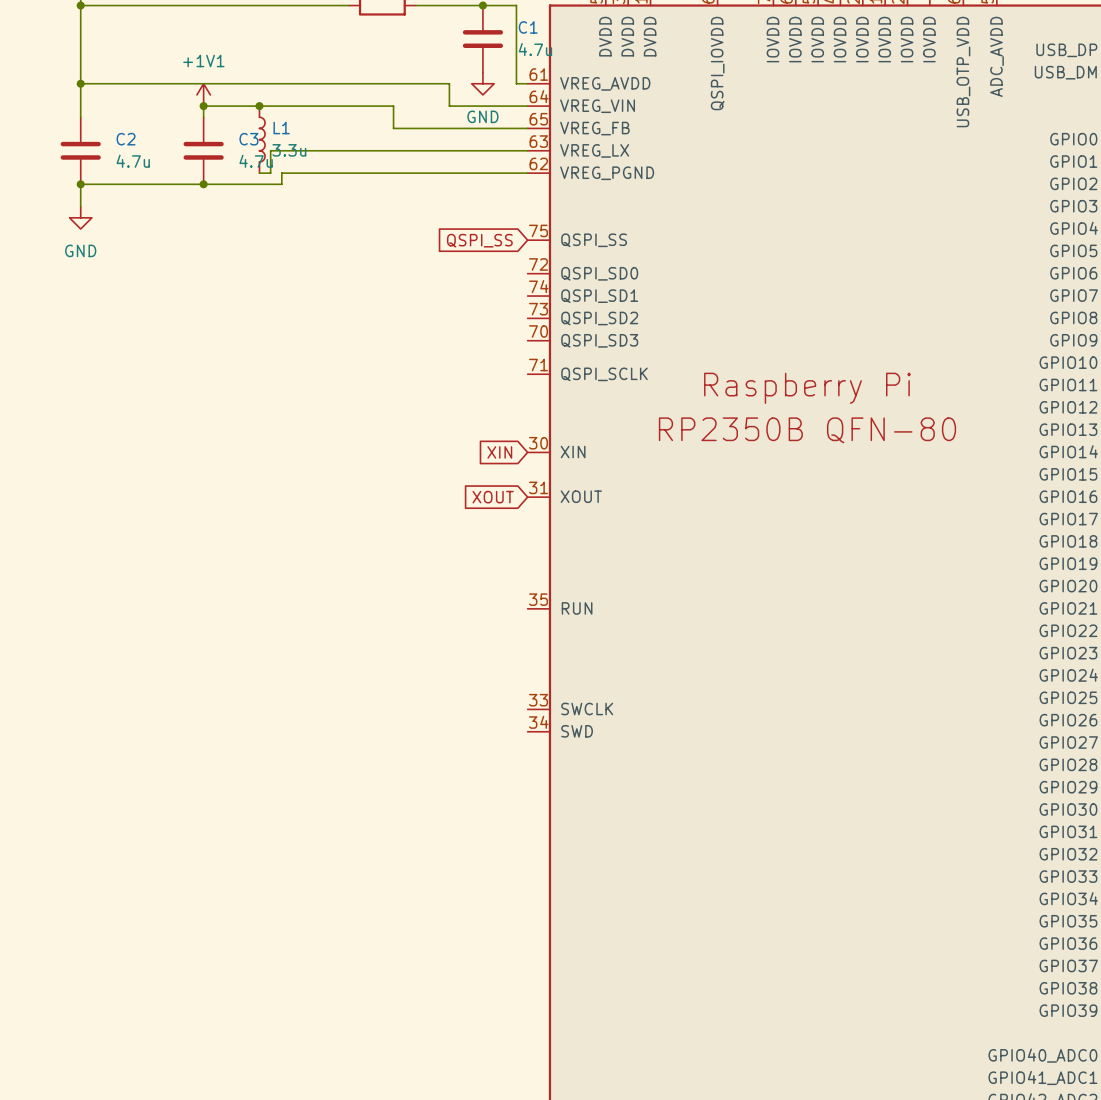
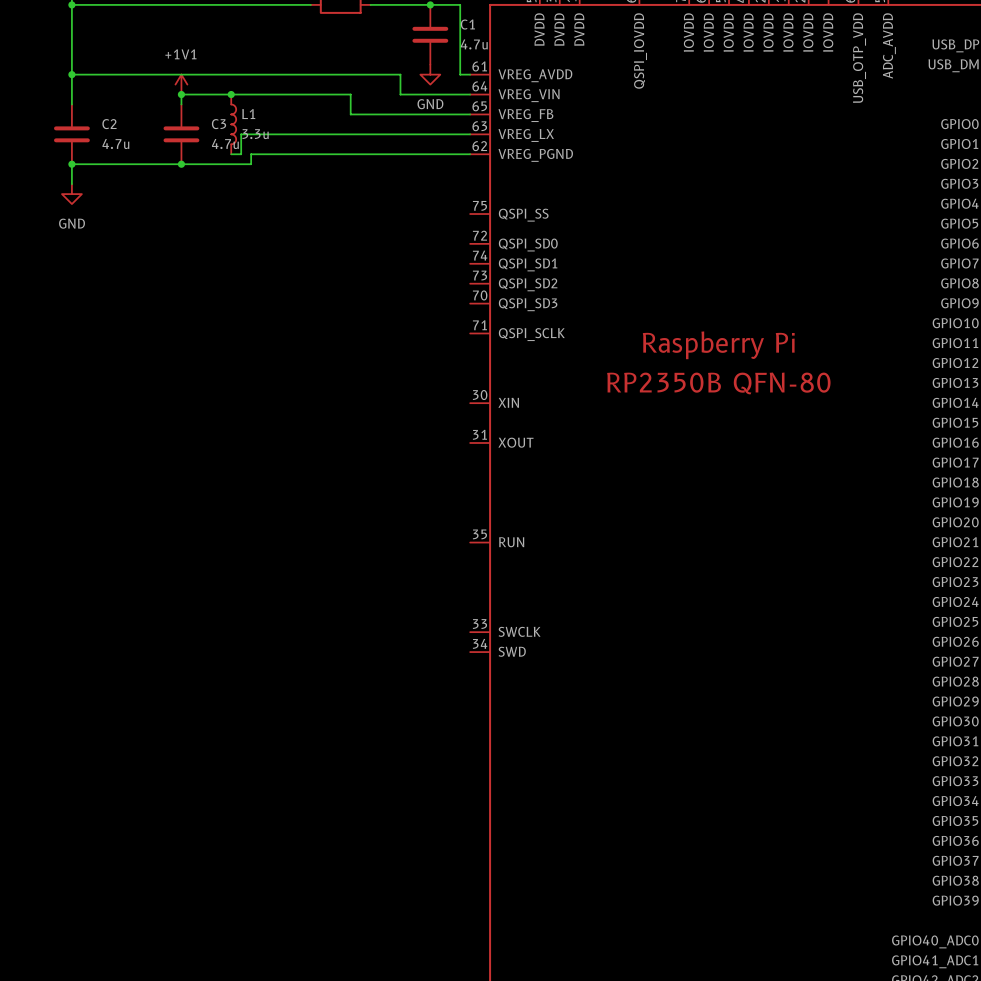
global label: QSPI_SS (479, 240) -> none
global label: XIN (499, 452) -> none
global label: XOUT (493, 497) -> none

